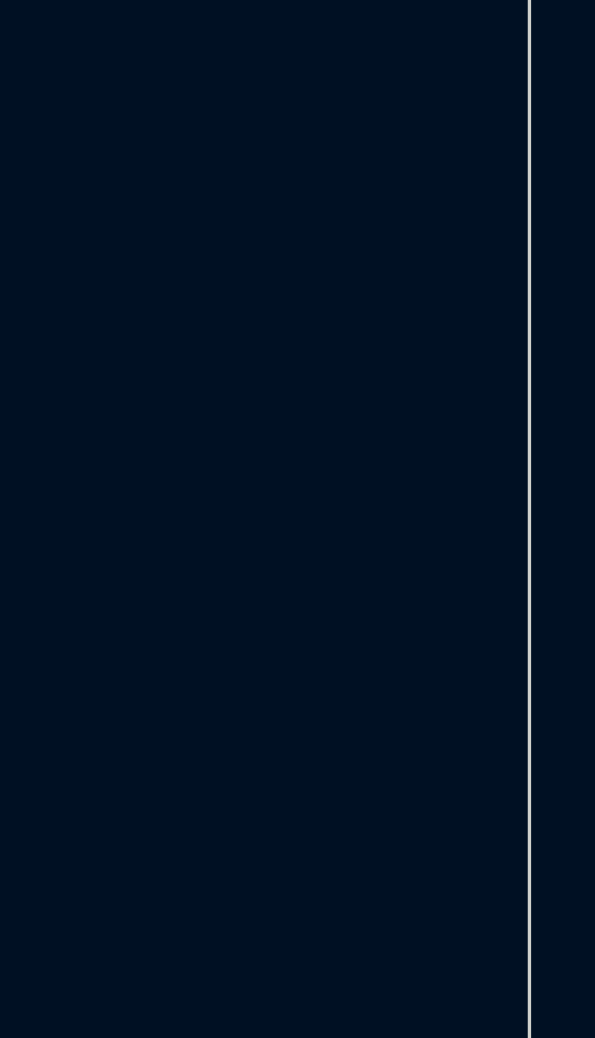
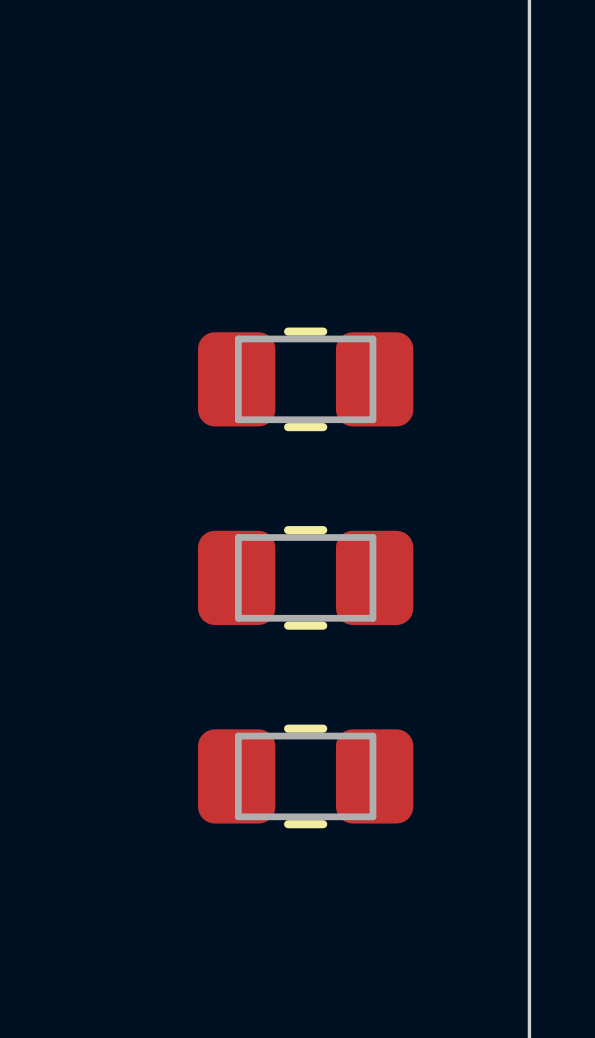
part: none -> (305, 379)
part: none -> (305, 577)
part: none -> (305, 776)

